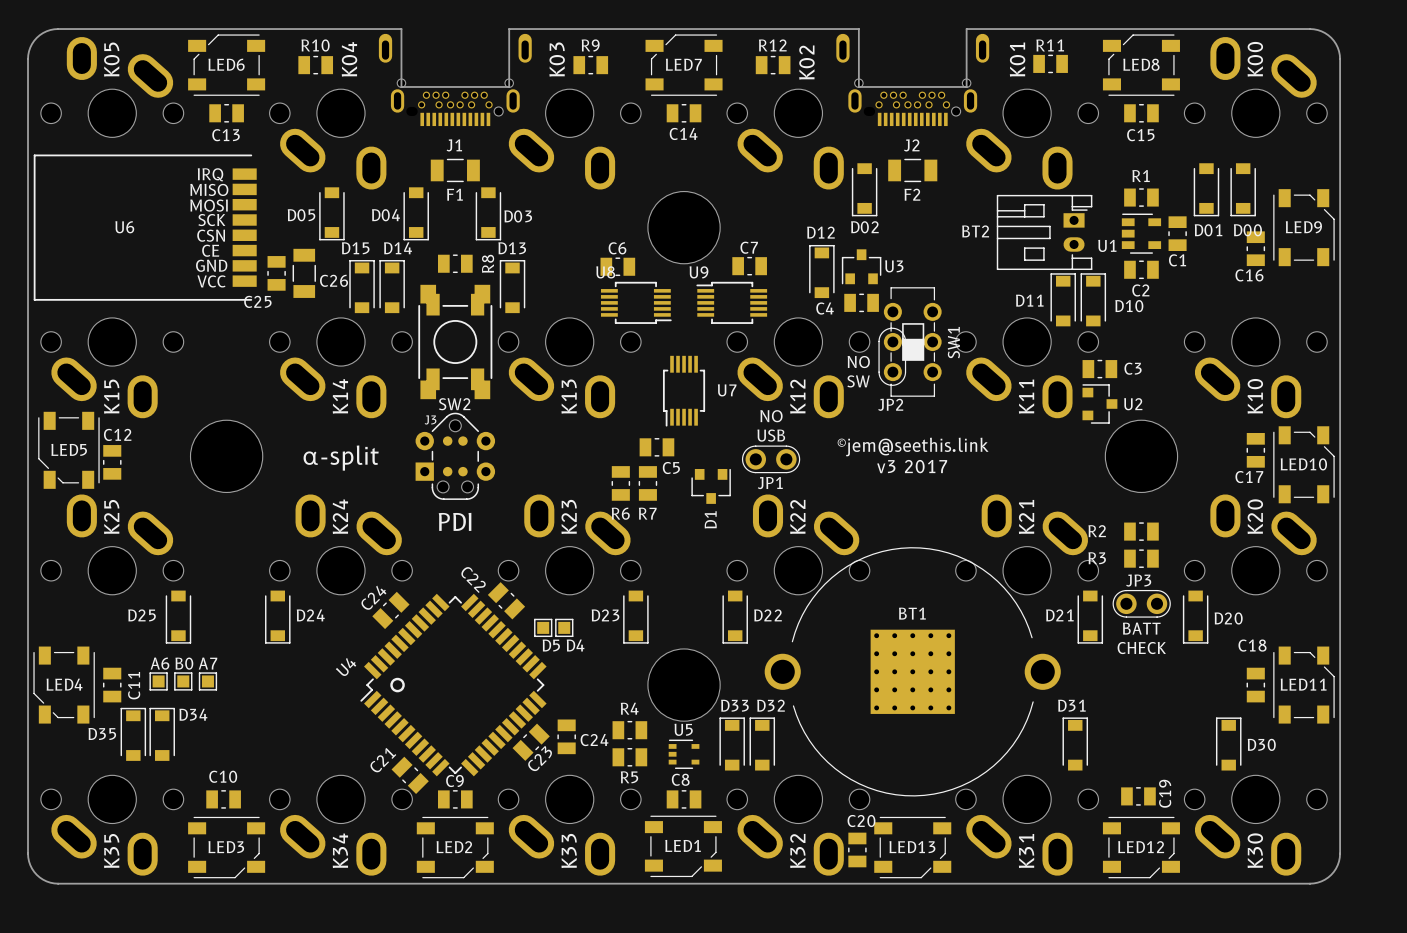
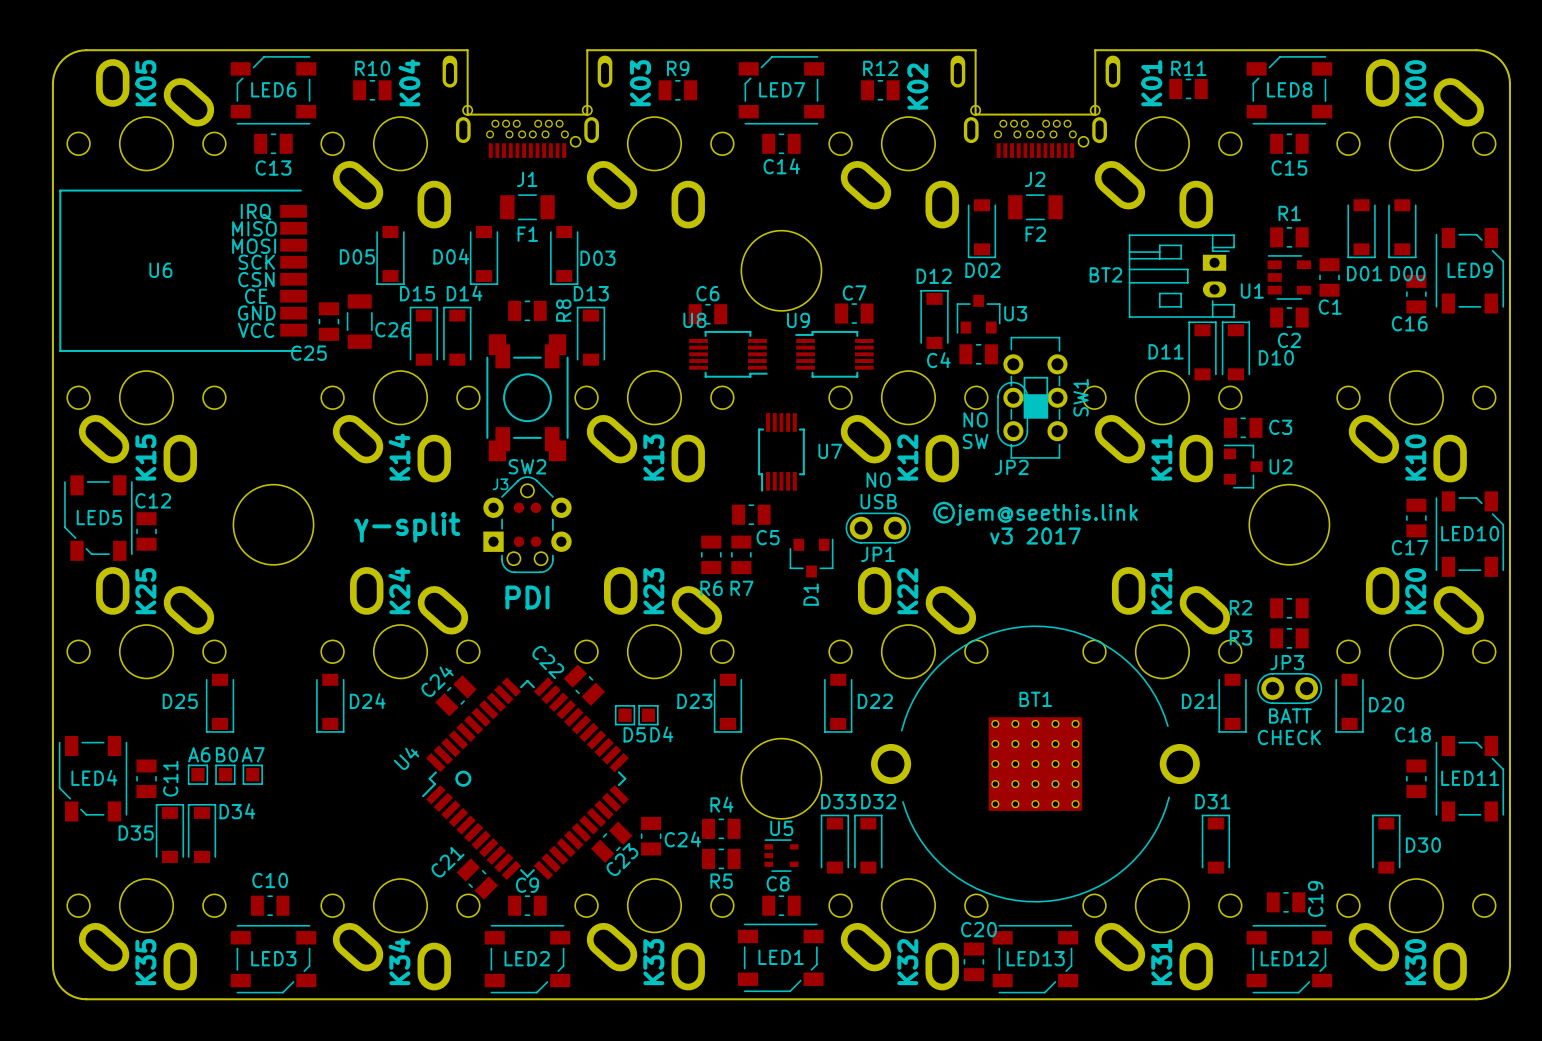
text: α-split (341, 458) -> γ-split (407, 527)

